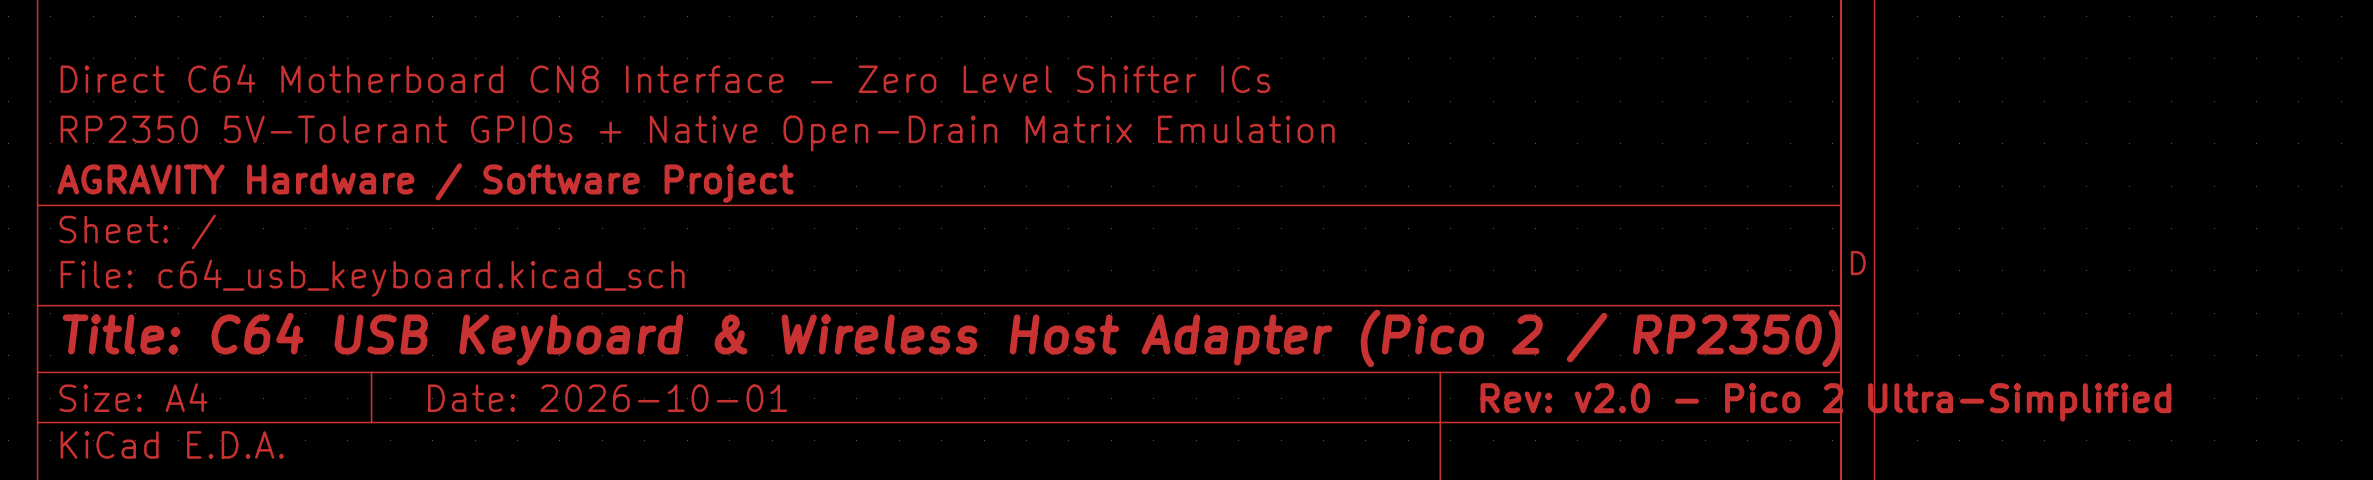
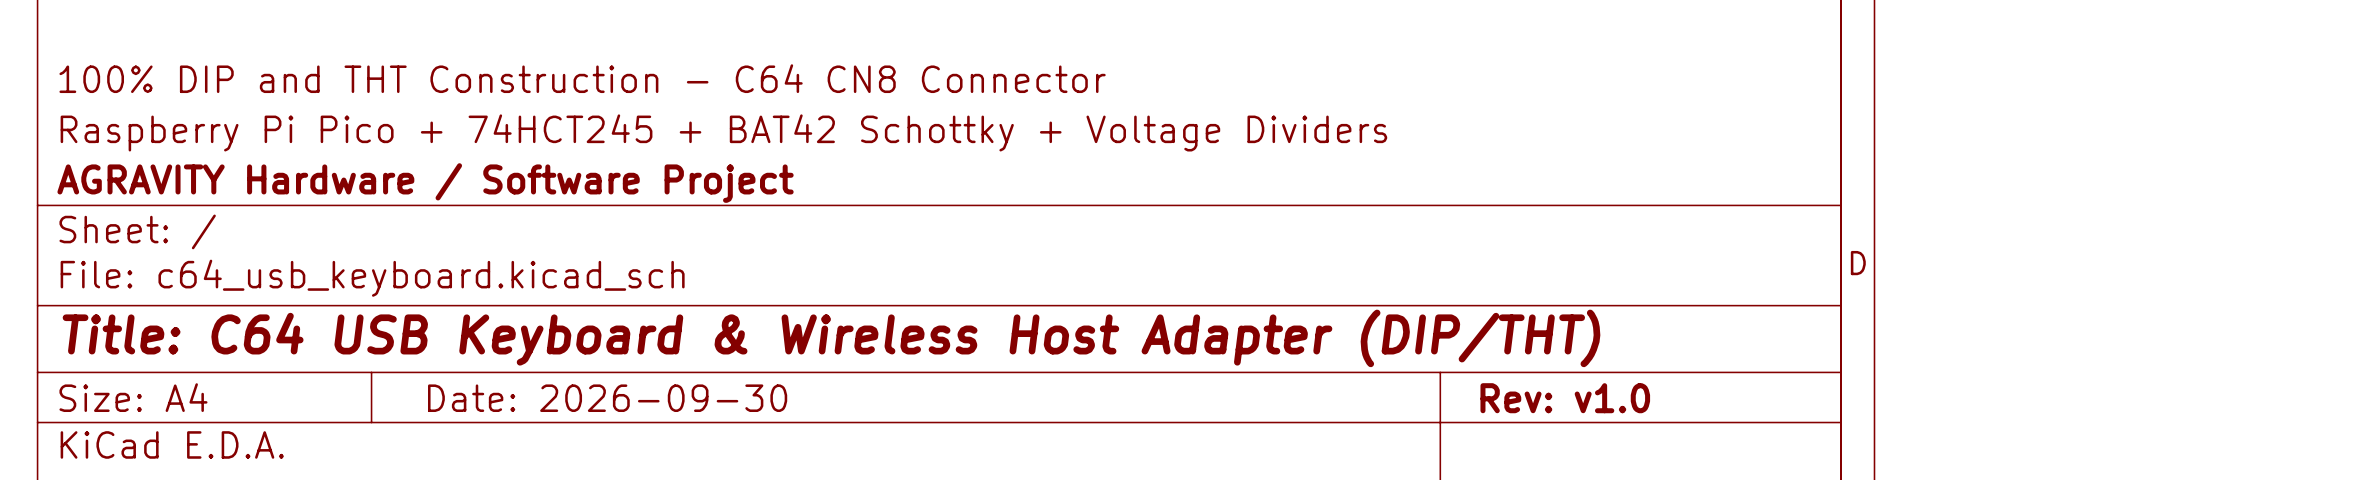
title block: Direct C64 Motherboard CN8 Interface - Zero Level Shifter ICs (665, 78) -> 100% DIP and THT Construction - C64 CN8 Connector (582, 78)
title block: RP2350 5V-Tolerant GPIOs + Native Open-Drain Matrix Emulation (697, 133) -> Raspberry Pi Pico + 74HCT245 + BAT42 Schottky + Voltage Dividers (723, 132)
title block: Title: C64 USB Keyboard & Wireless Host Adapter (Pico 2 / RP2350) (952, 338) -> Title: C64 USB Keyboard & Wireless Host Adapter (DIP/THT) (831, 338)
title block: Date: 2026-10-01 (607, 398) -> Date: 2026-09-30 (607, 398)
title block: Rev: v2.0 - Pico 2 Ultra-Simplified (1825, 402) -> Rev: v1.0 (1565, 398)

